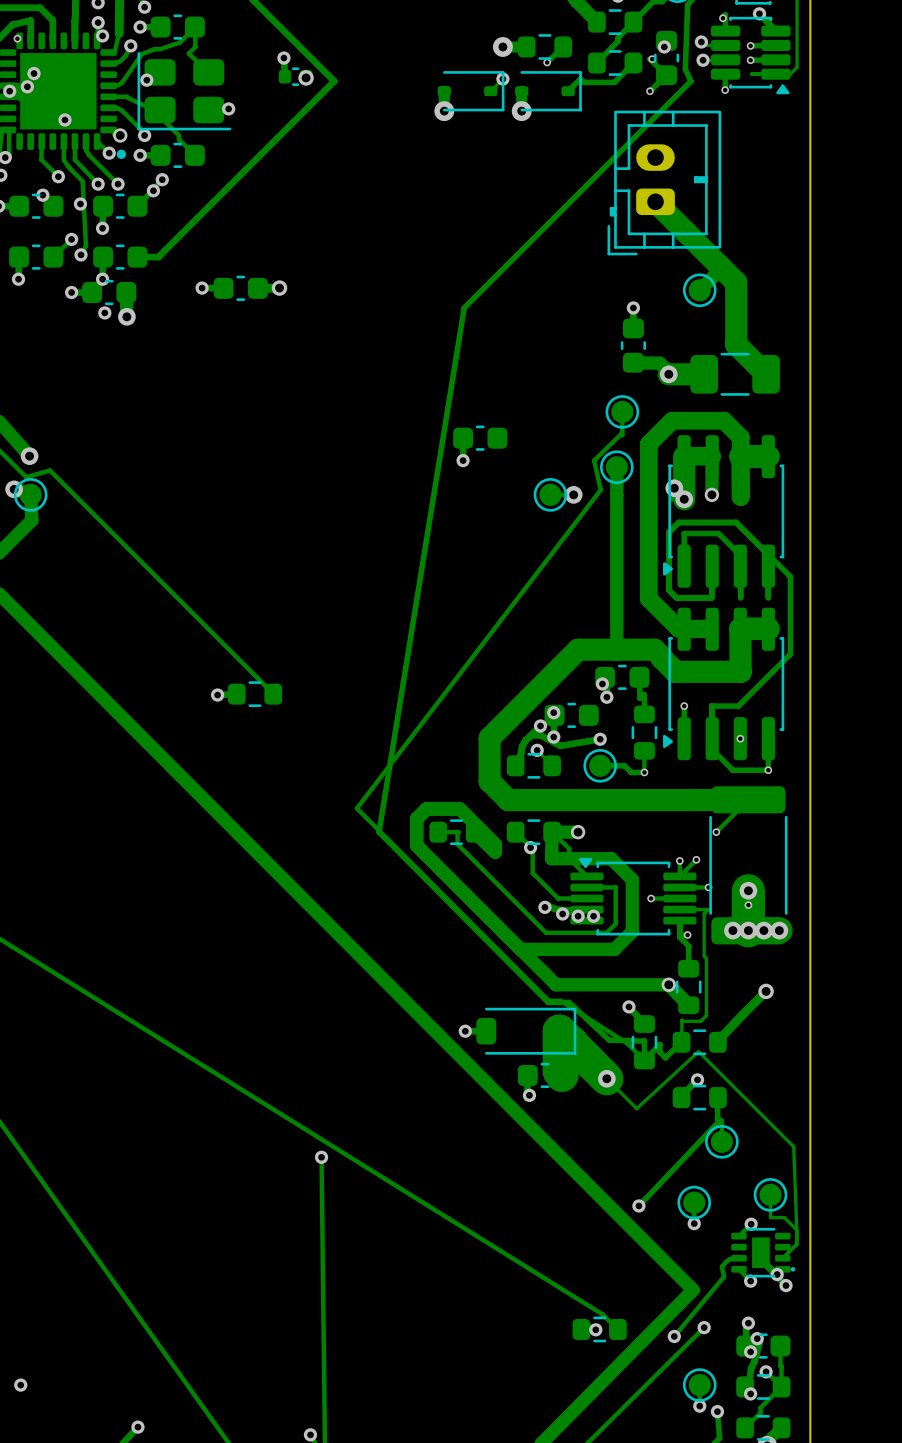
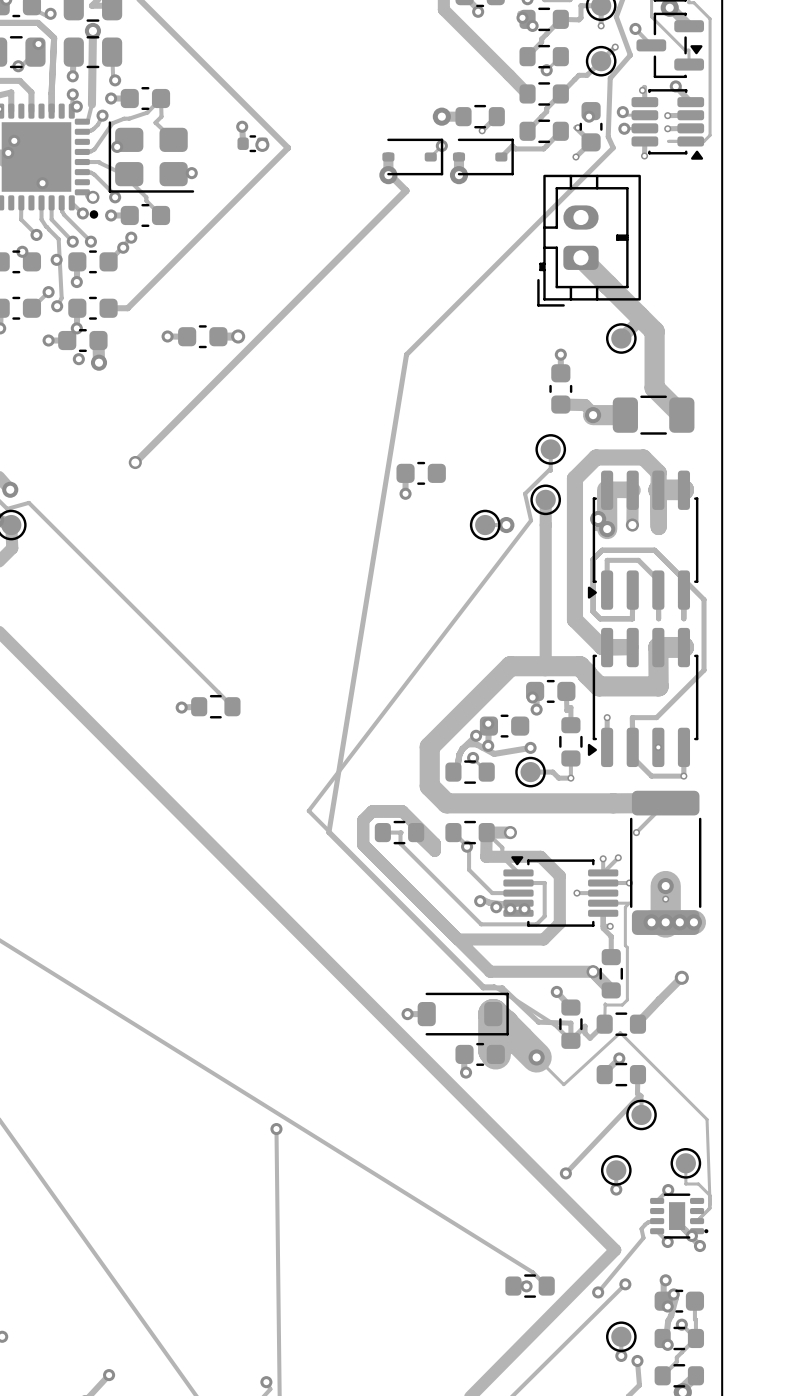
track: none -> (388, 156) (388, 173) (406, 190) (135, 462)
via: none -> (135, 462)

